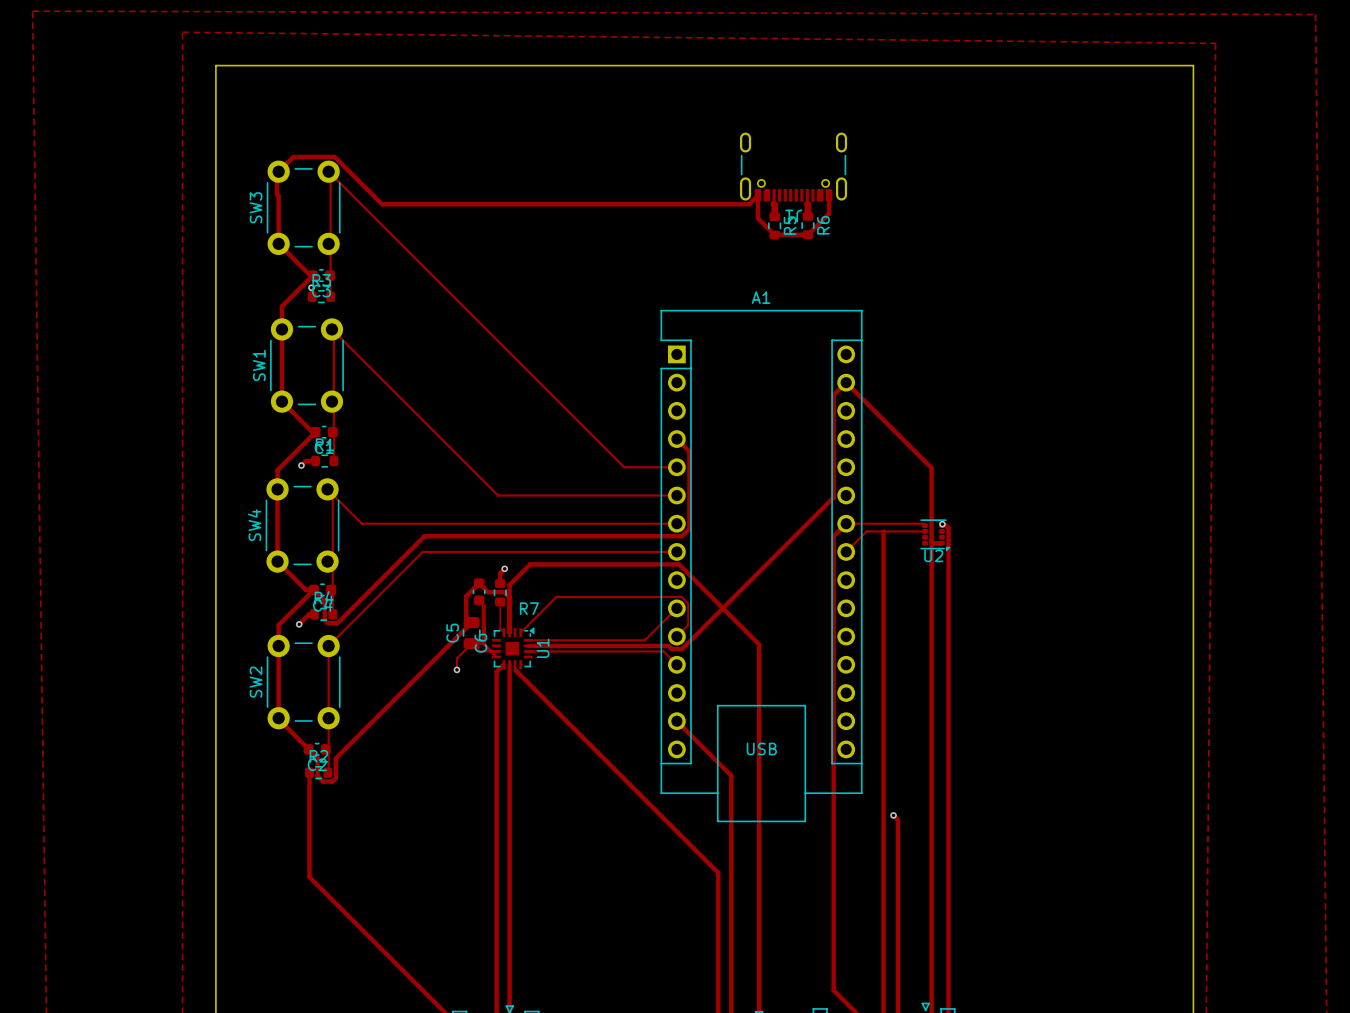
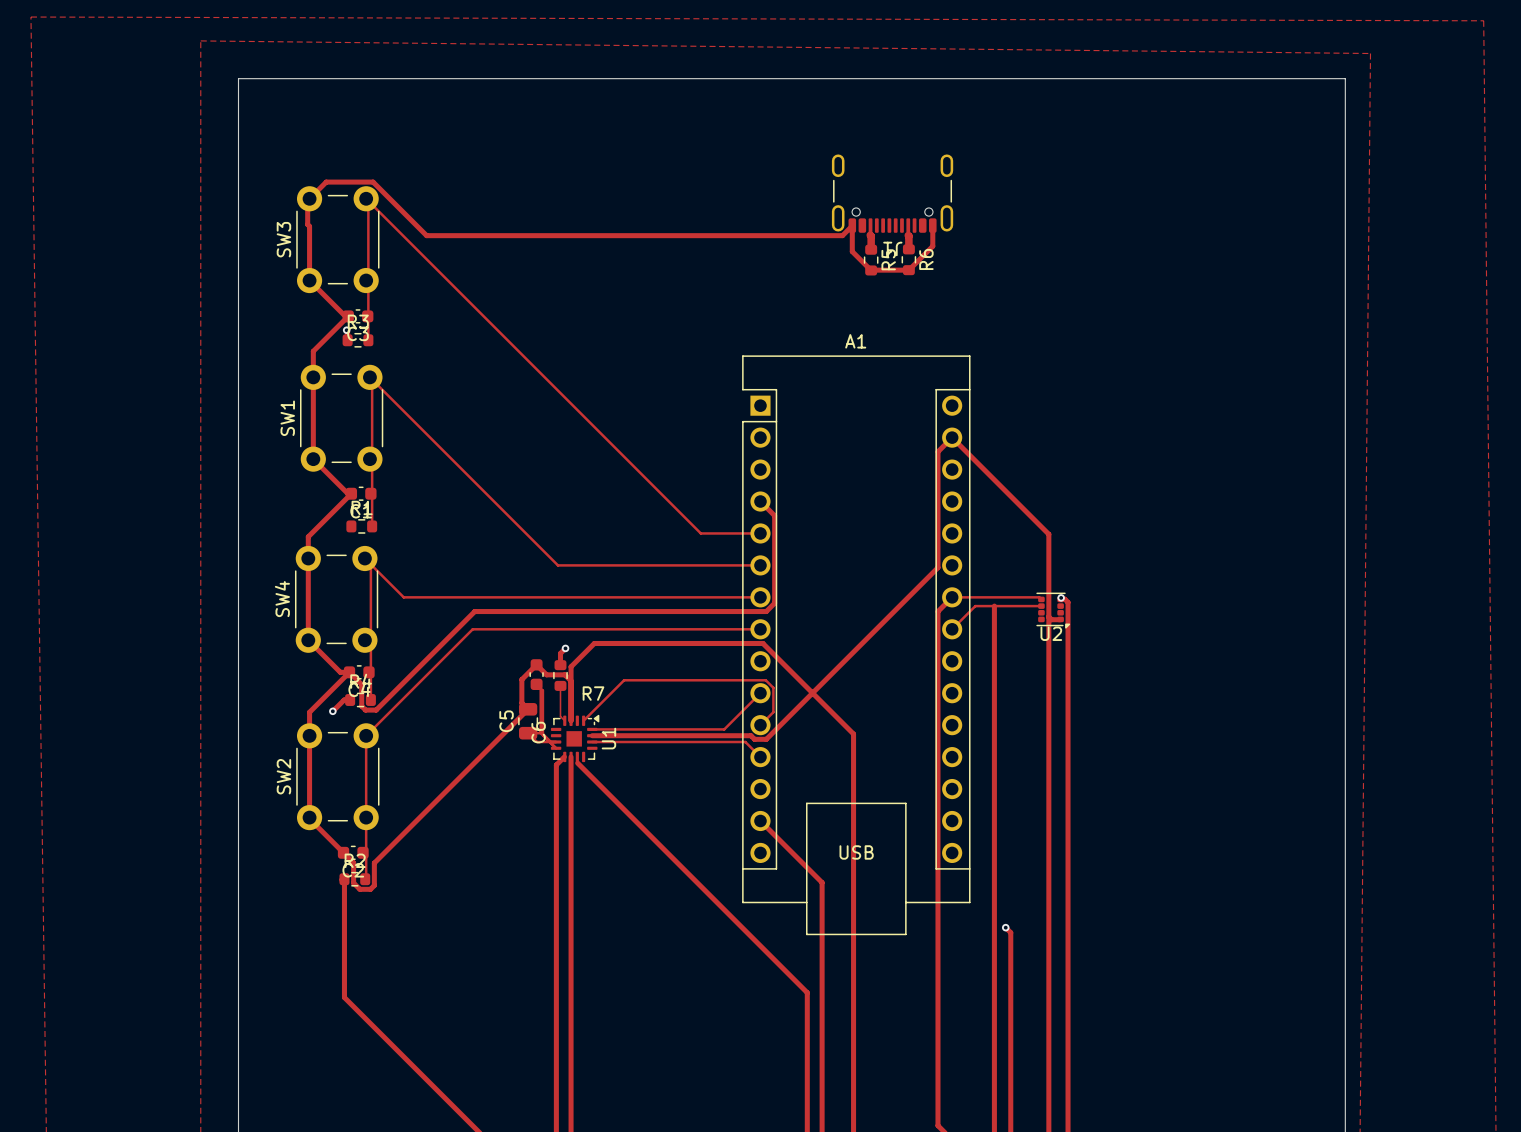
track: (315, 461) (305, 461) (301, 465) -> none
via: (301, 465) -> none
track: (469, 646) (471, 643) (456, 658) (456, 669) -> none
via: (456, 669) -> none

